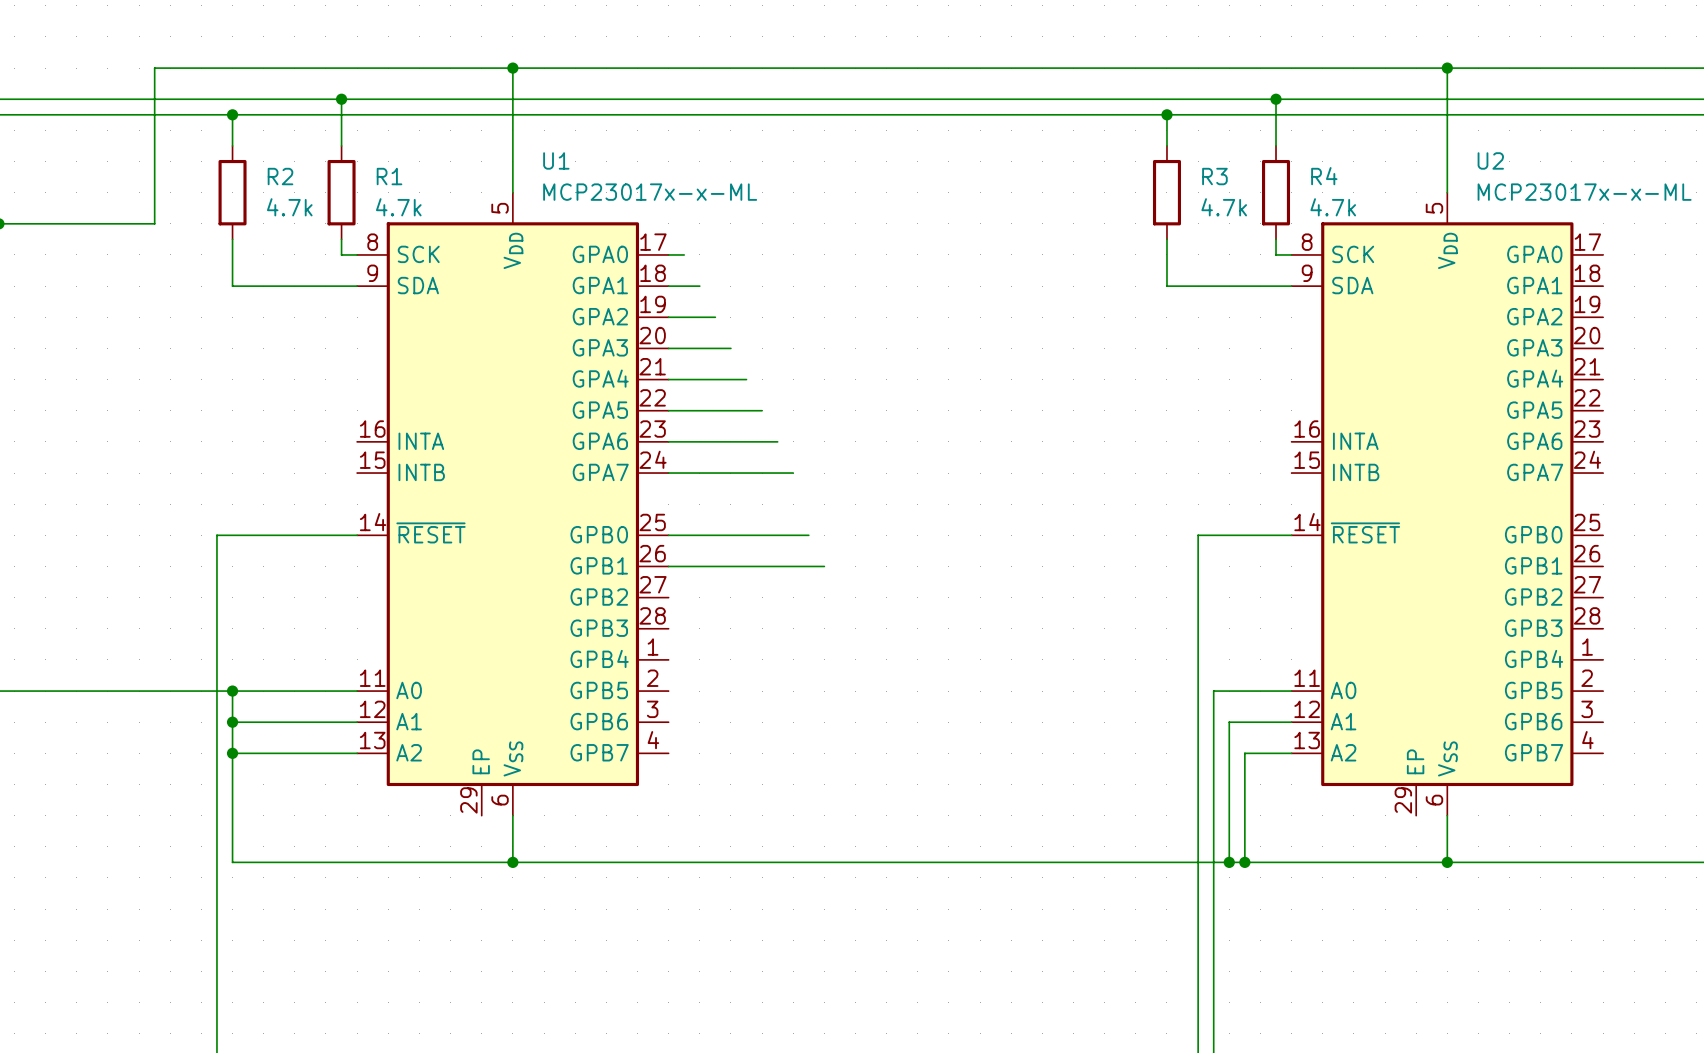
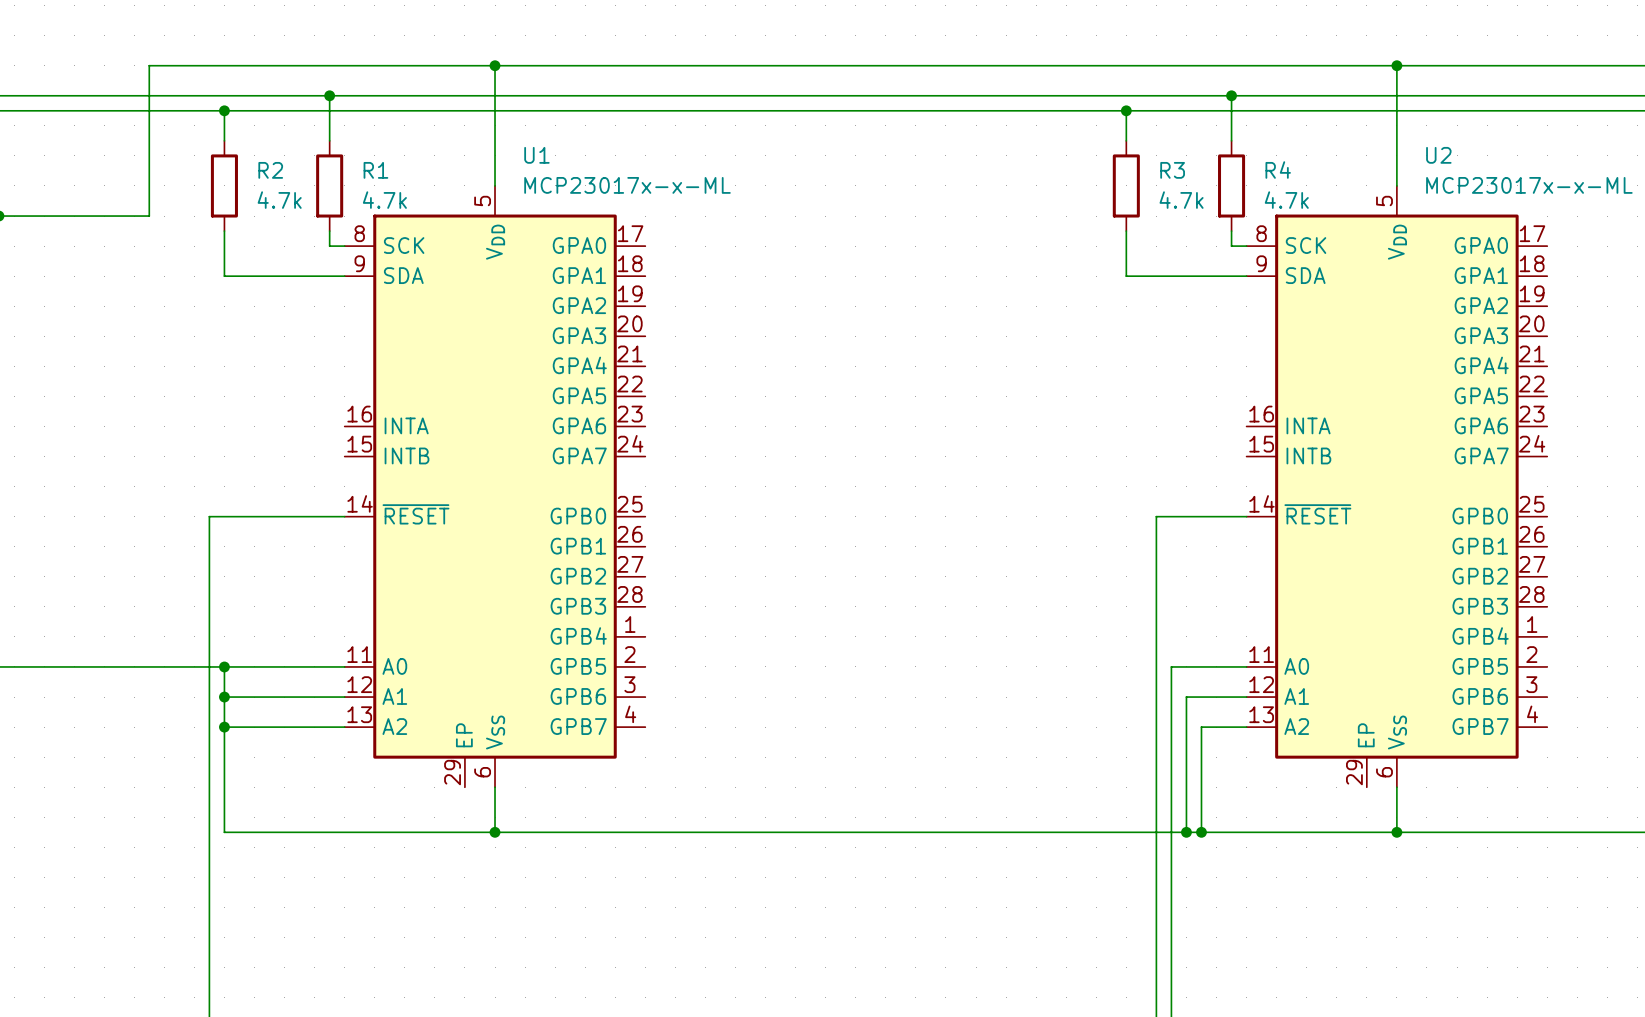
wire: (668, 254) (684, 254) -> none
wire: (668, 286) (699, 286) -> none
wire: (668, 317) (715, 317) -> none
wire: (668, 348) (730, 348) -> none
wire: (668, 379) (746, 379) -> none
wire: (668, 410) (762, 410) -> none
wire: (668, 441) (777, 441) -> none
wire: (668, 473) (793, 473) -> none
wire: (668, 535) (808, 535) -> none
wire: (668, 566) (824, 566) -> none

